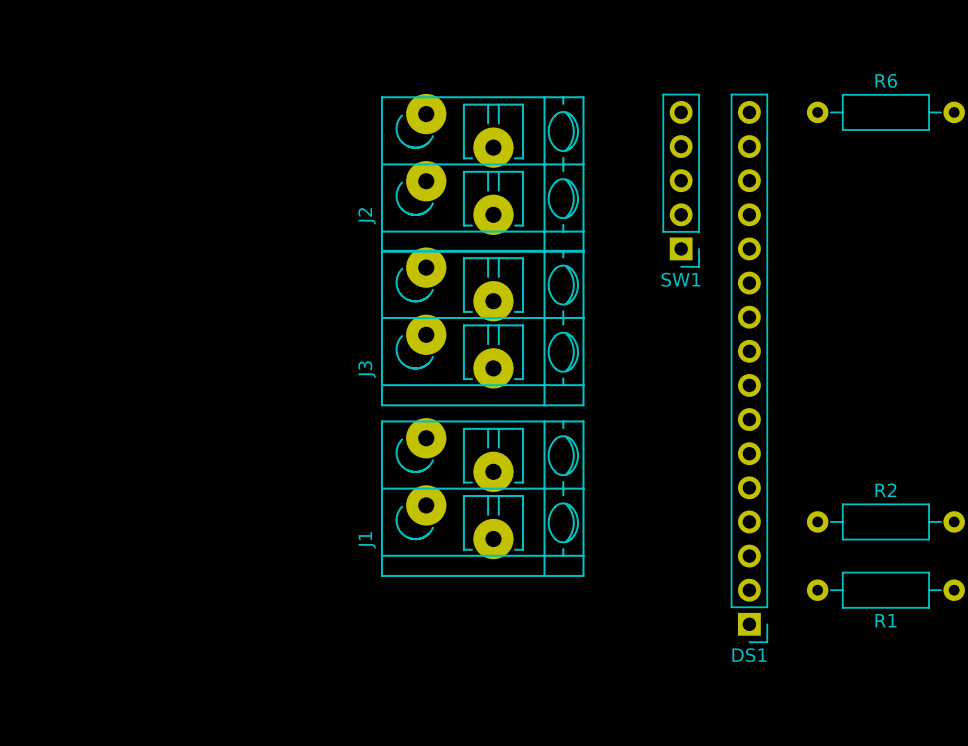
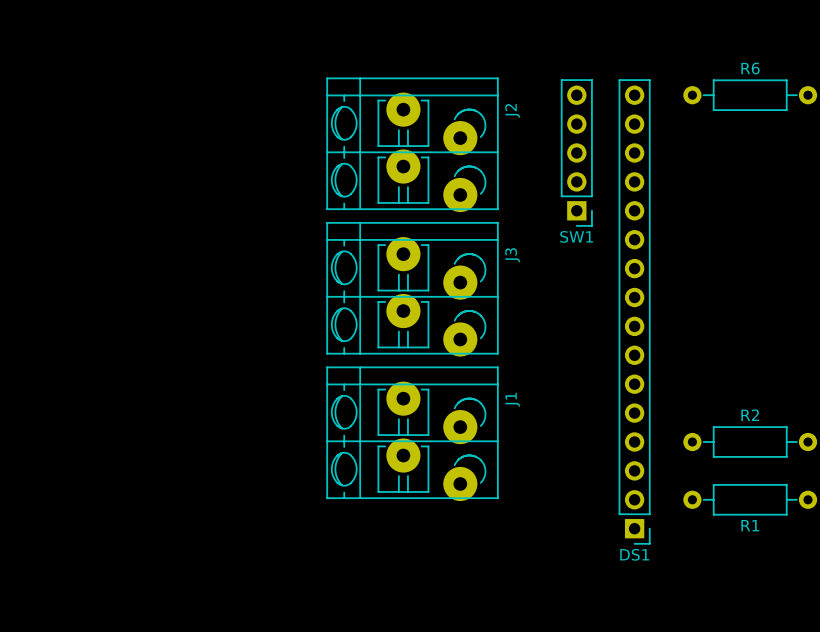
J2 rotation: 0° (482, 173) -> 180° (412, 144)
J3 rotation: 0° (482, 326) -> 180° (412, 289)
J1 rotation: 0° (482, 497) -> 180° (412, 433)

